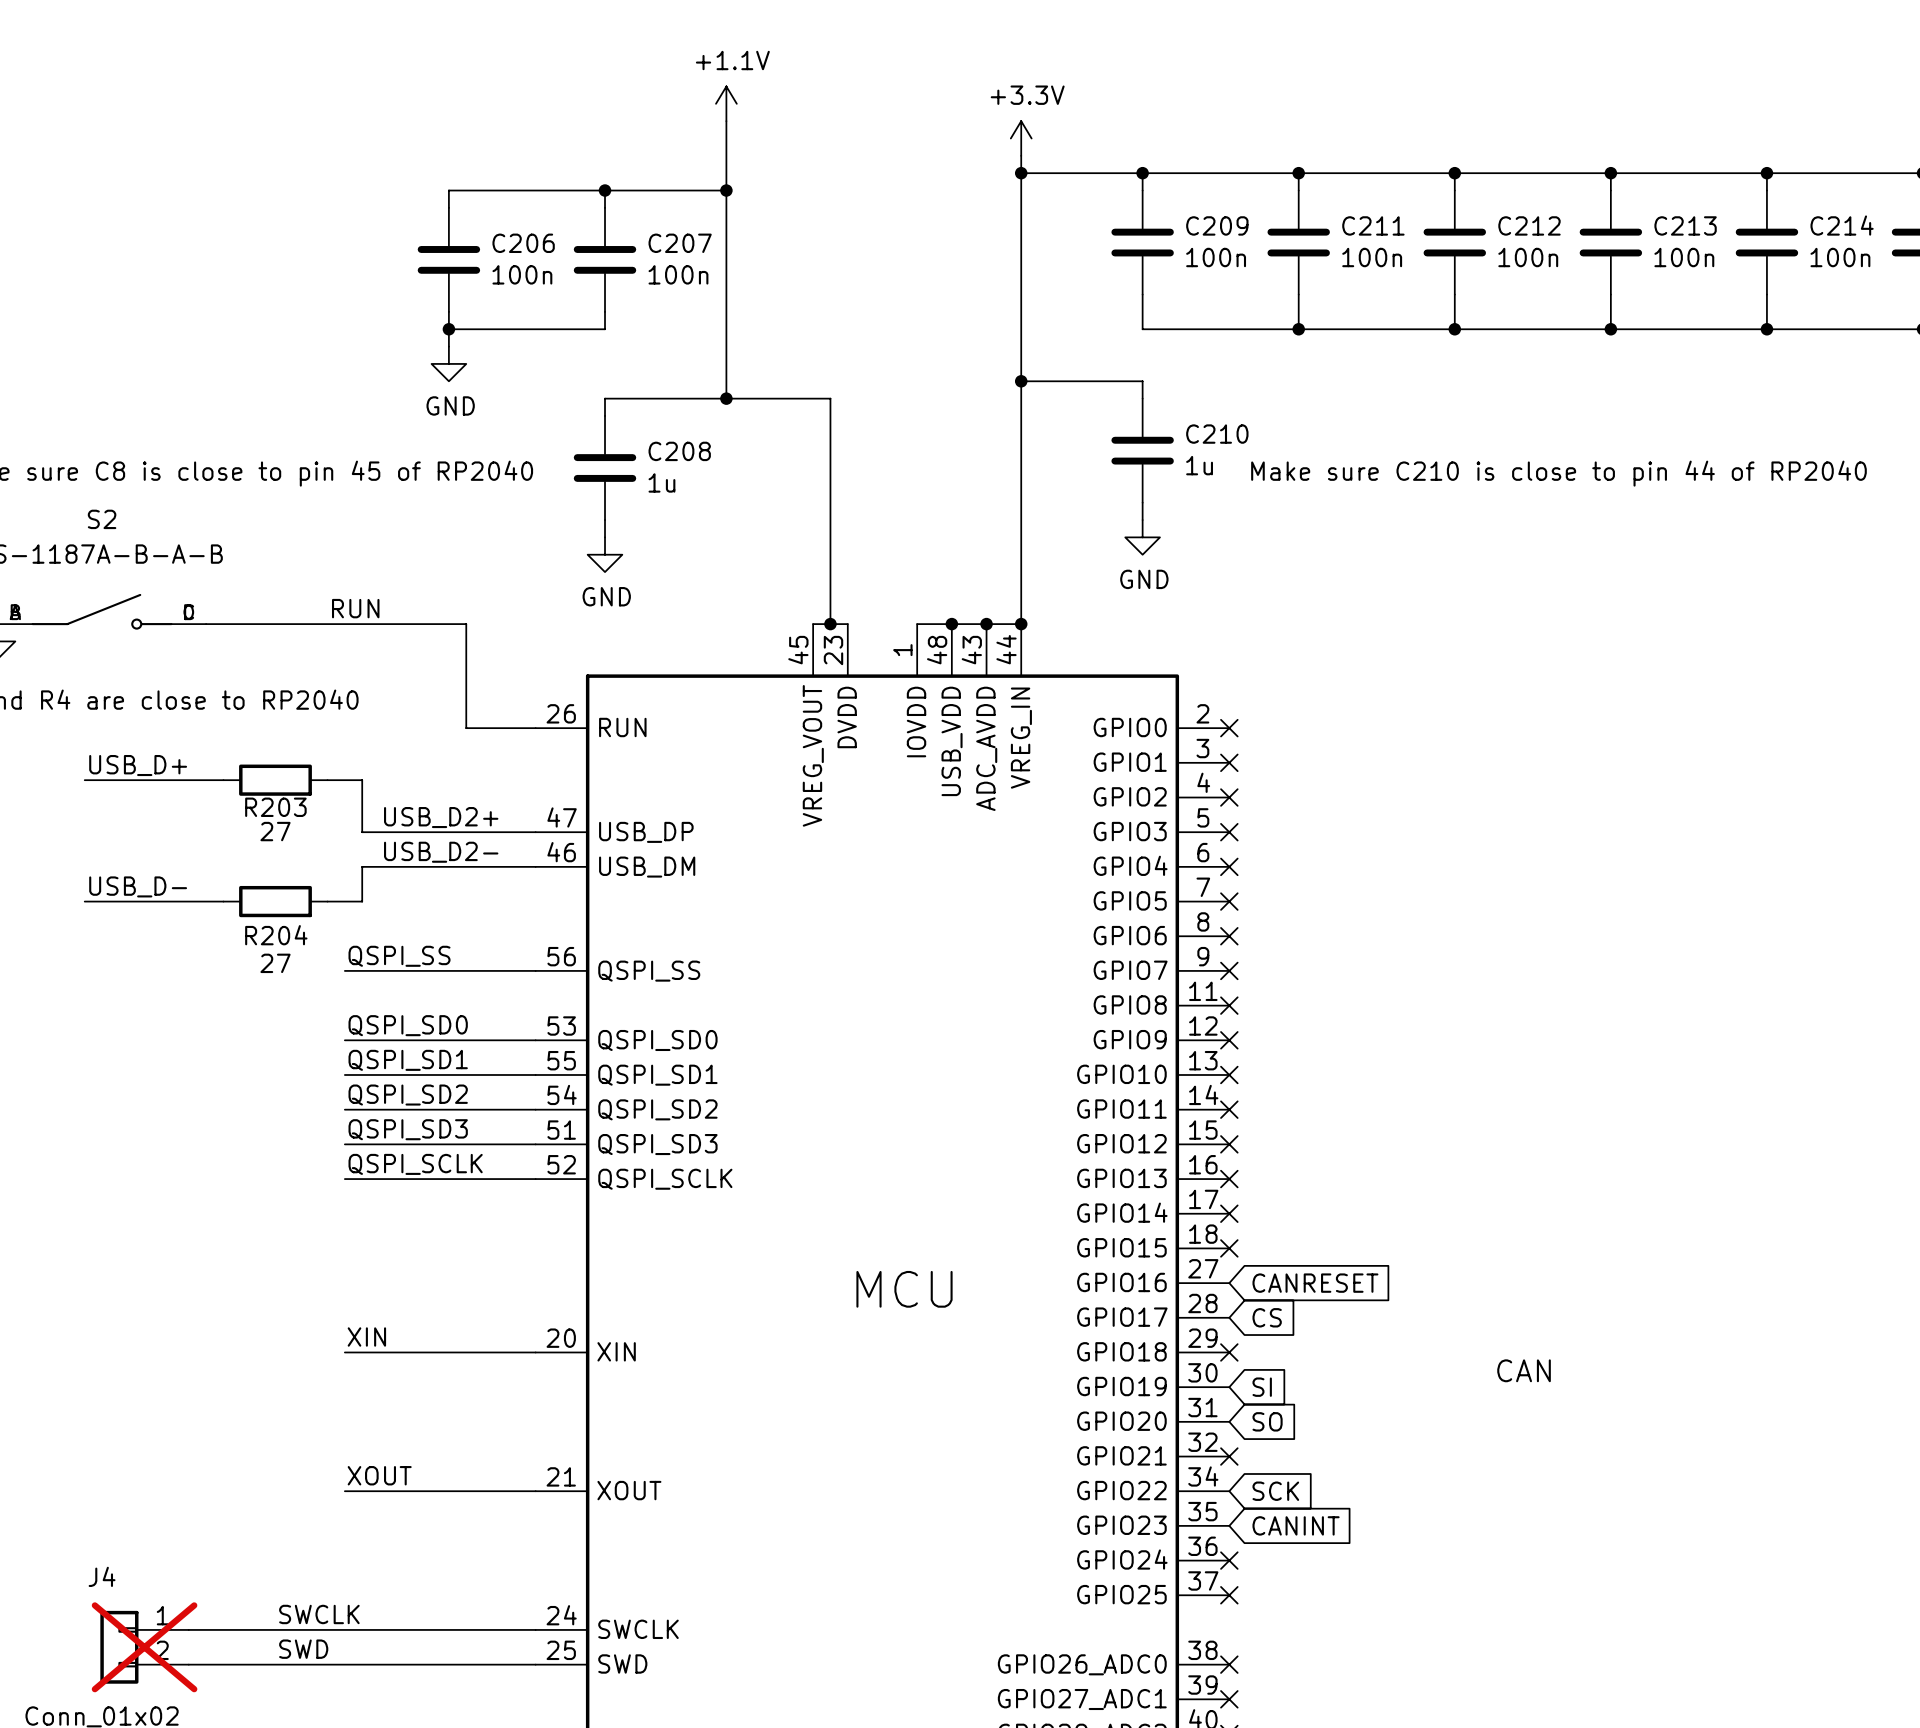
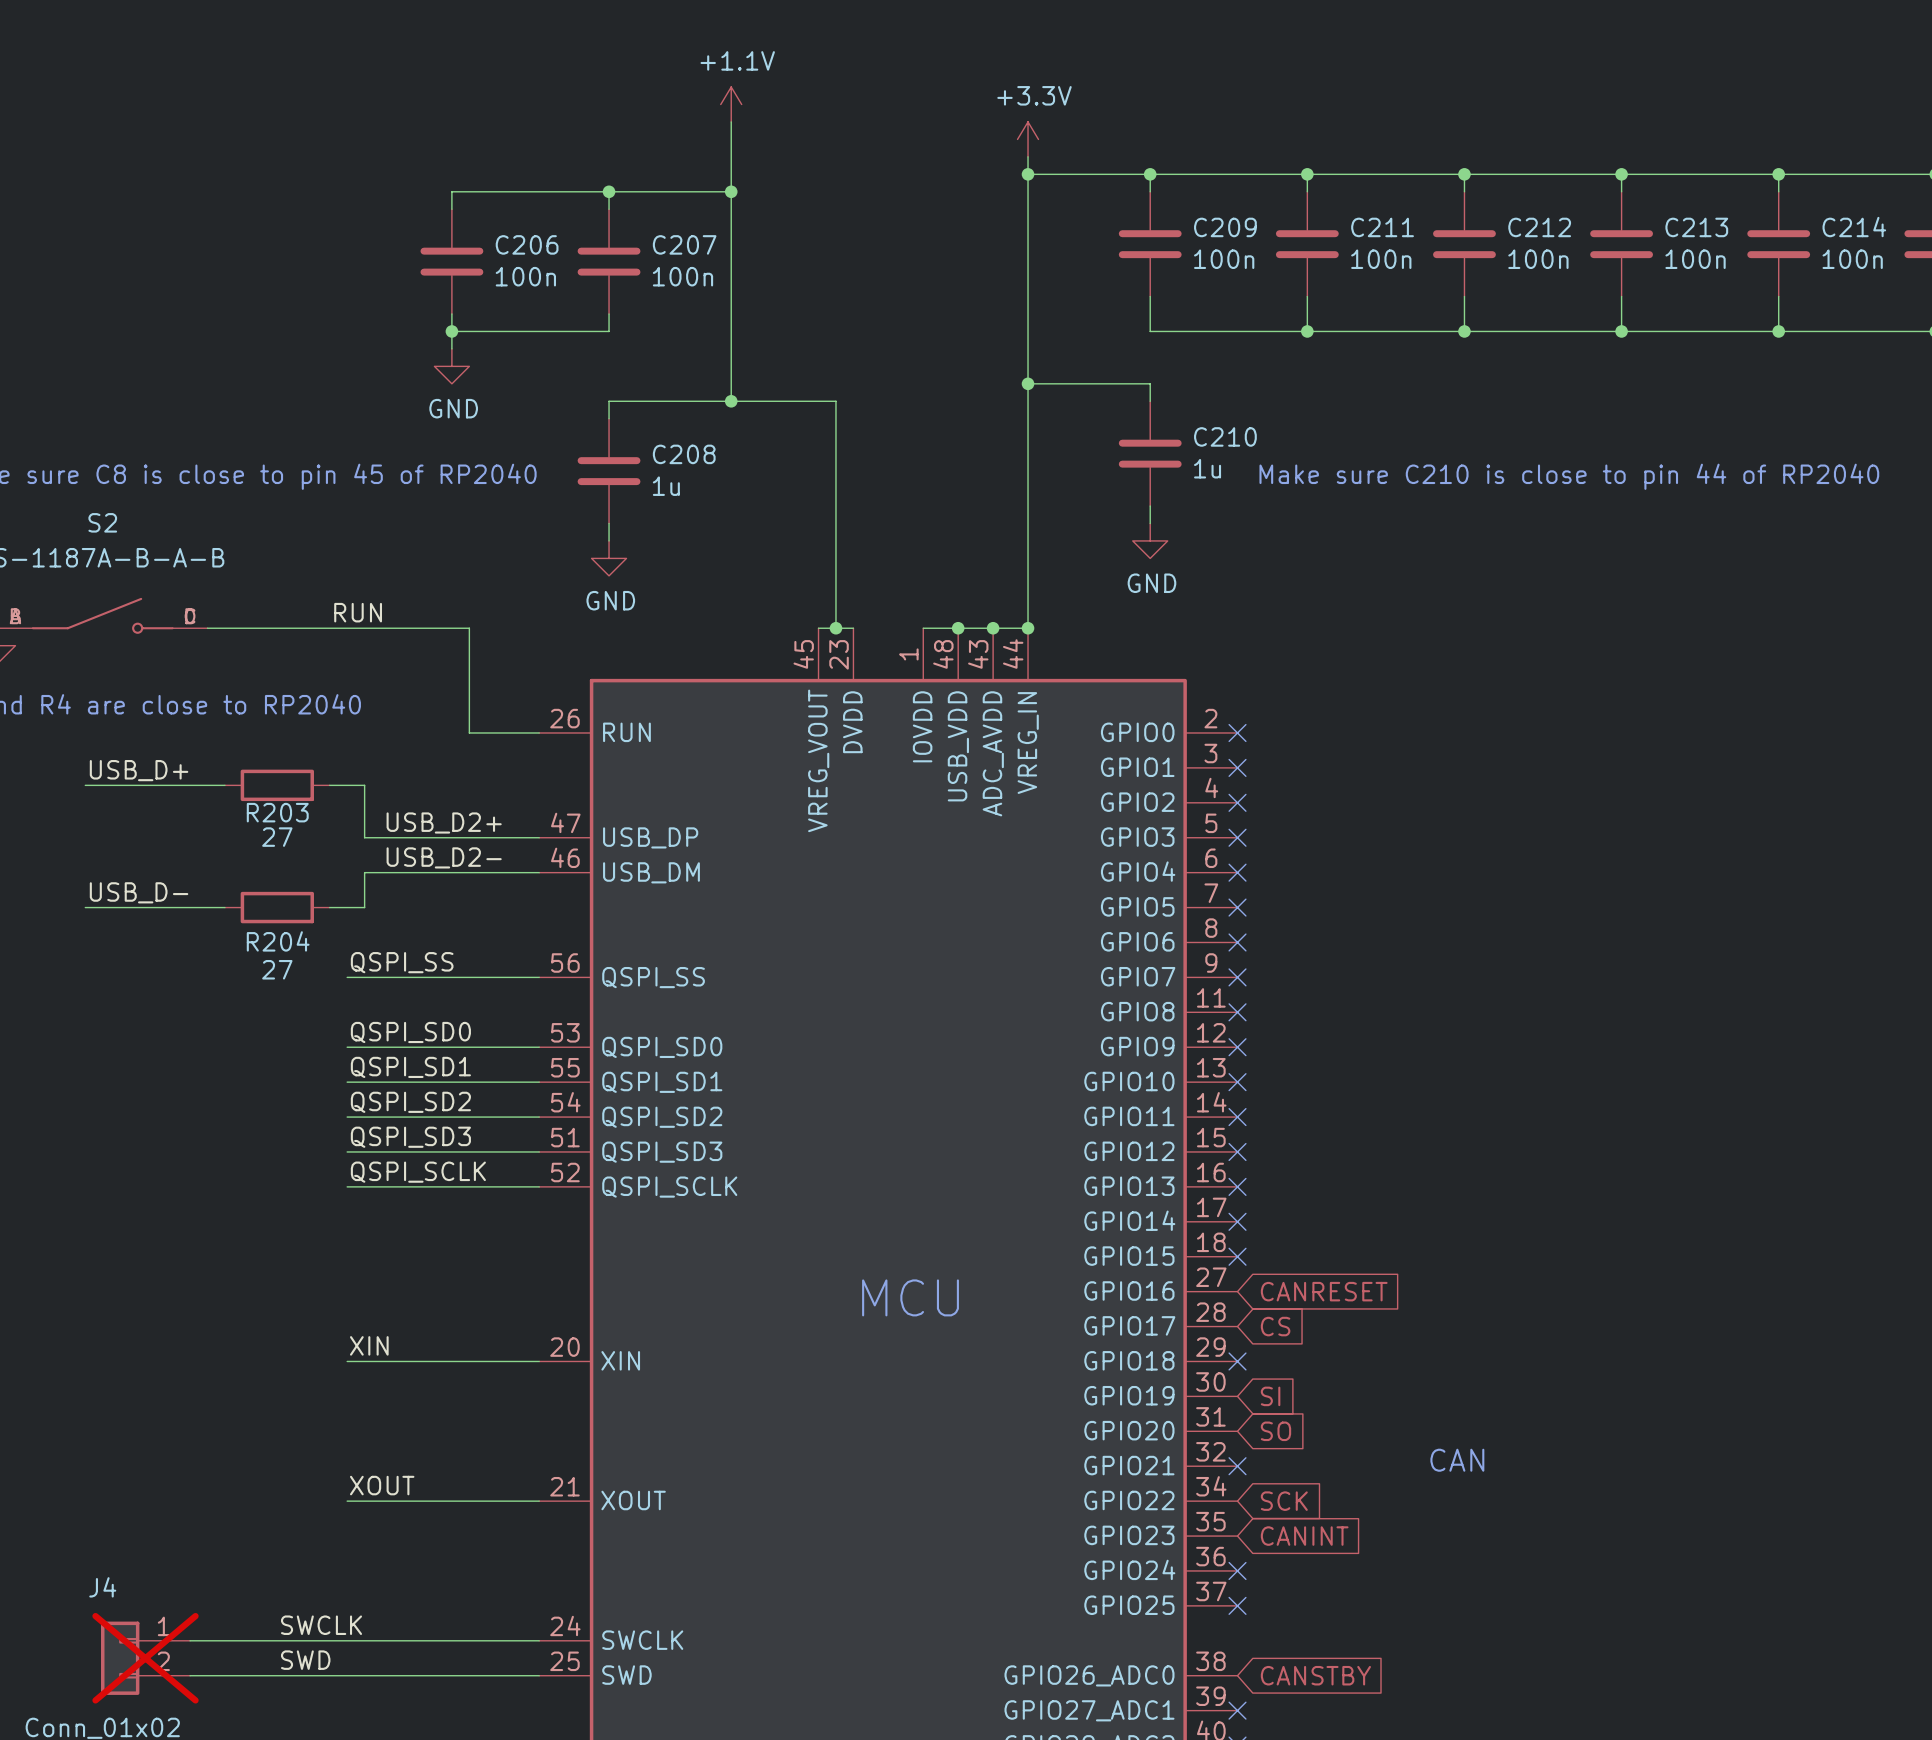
text position: CAN (1524, 1370) -> CAN (1457, 1460)
no-connect mark: (1229, 1664) -> none
global label: none -> CANSTBY (1315, 1675)

